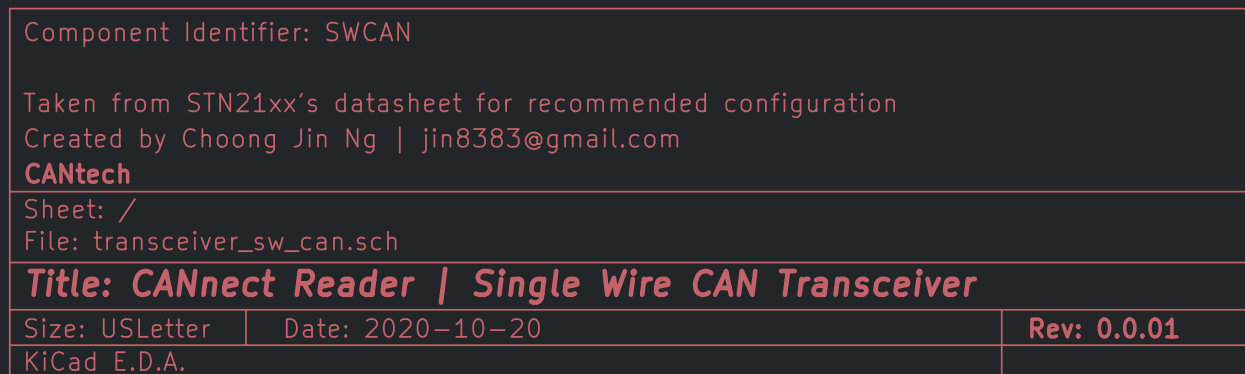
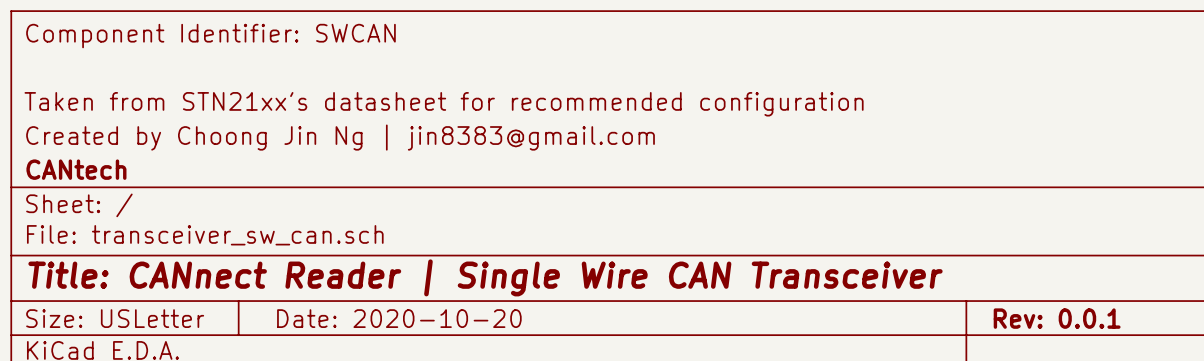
title block: Rev: 0.0.01 (1104, 327) -> Rev: 0.0.1 (1057, 318)

